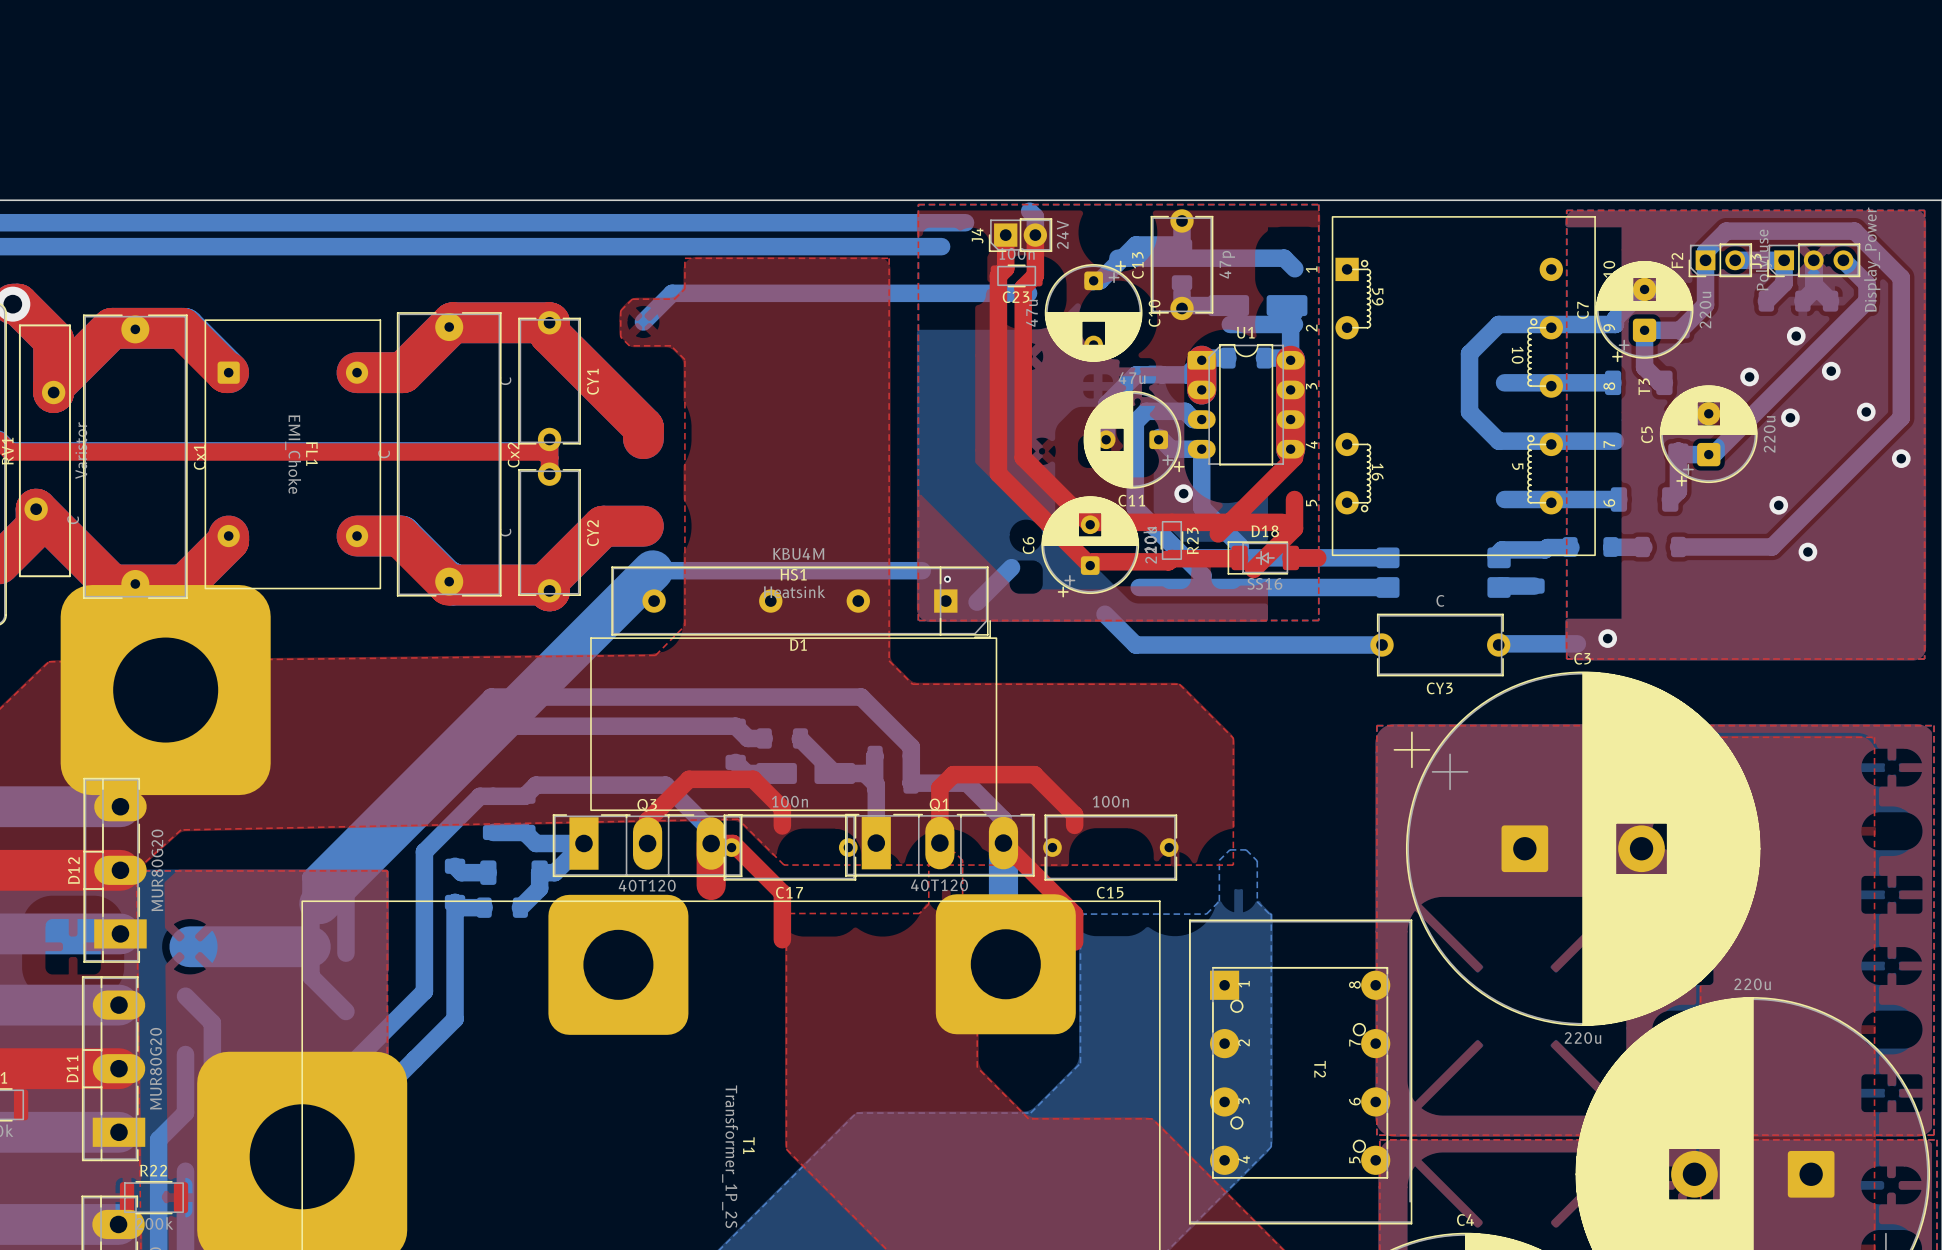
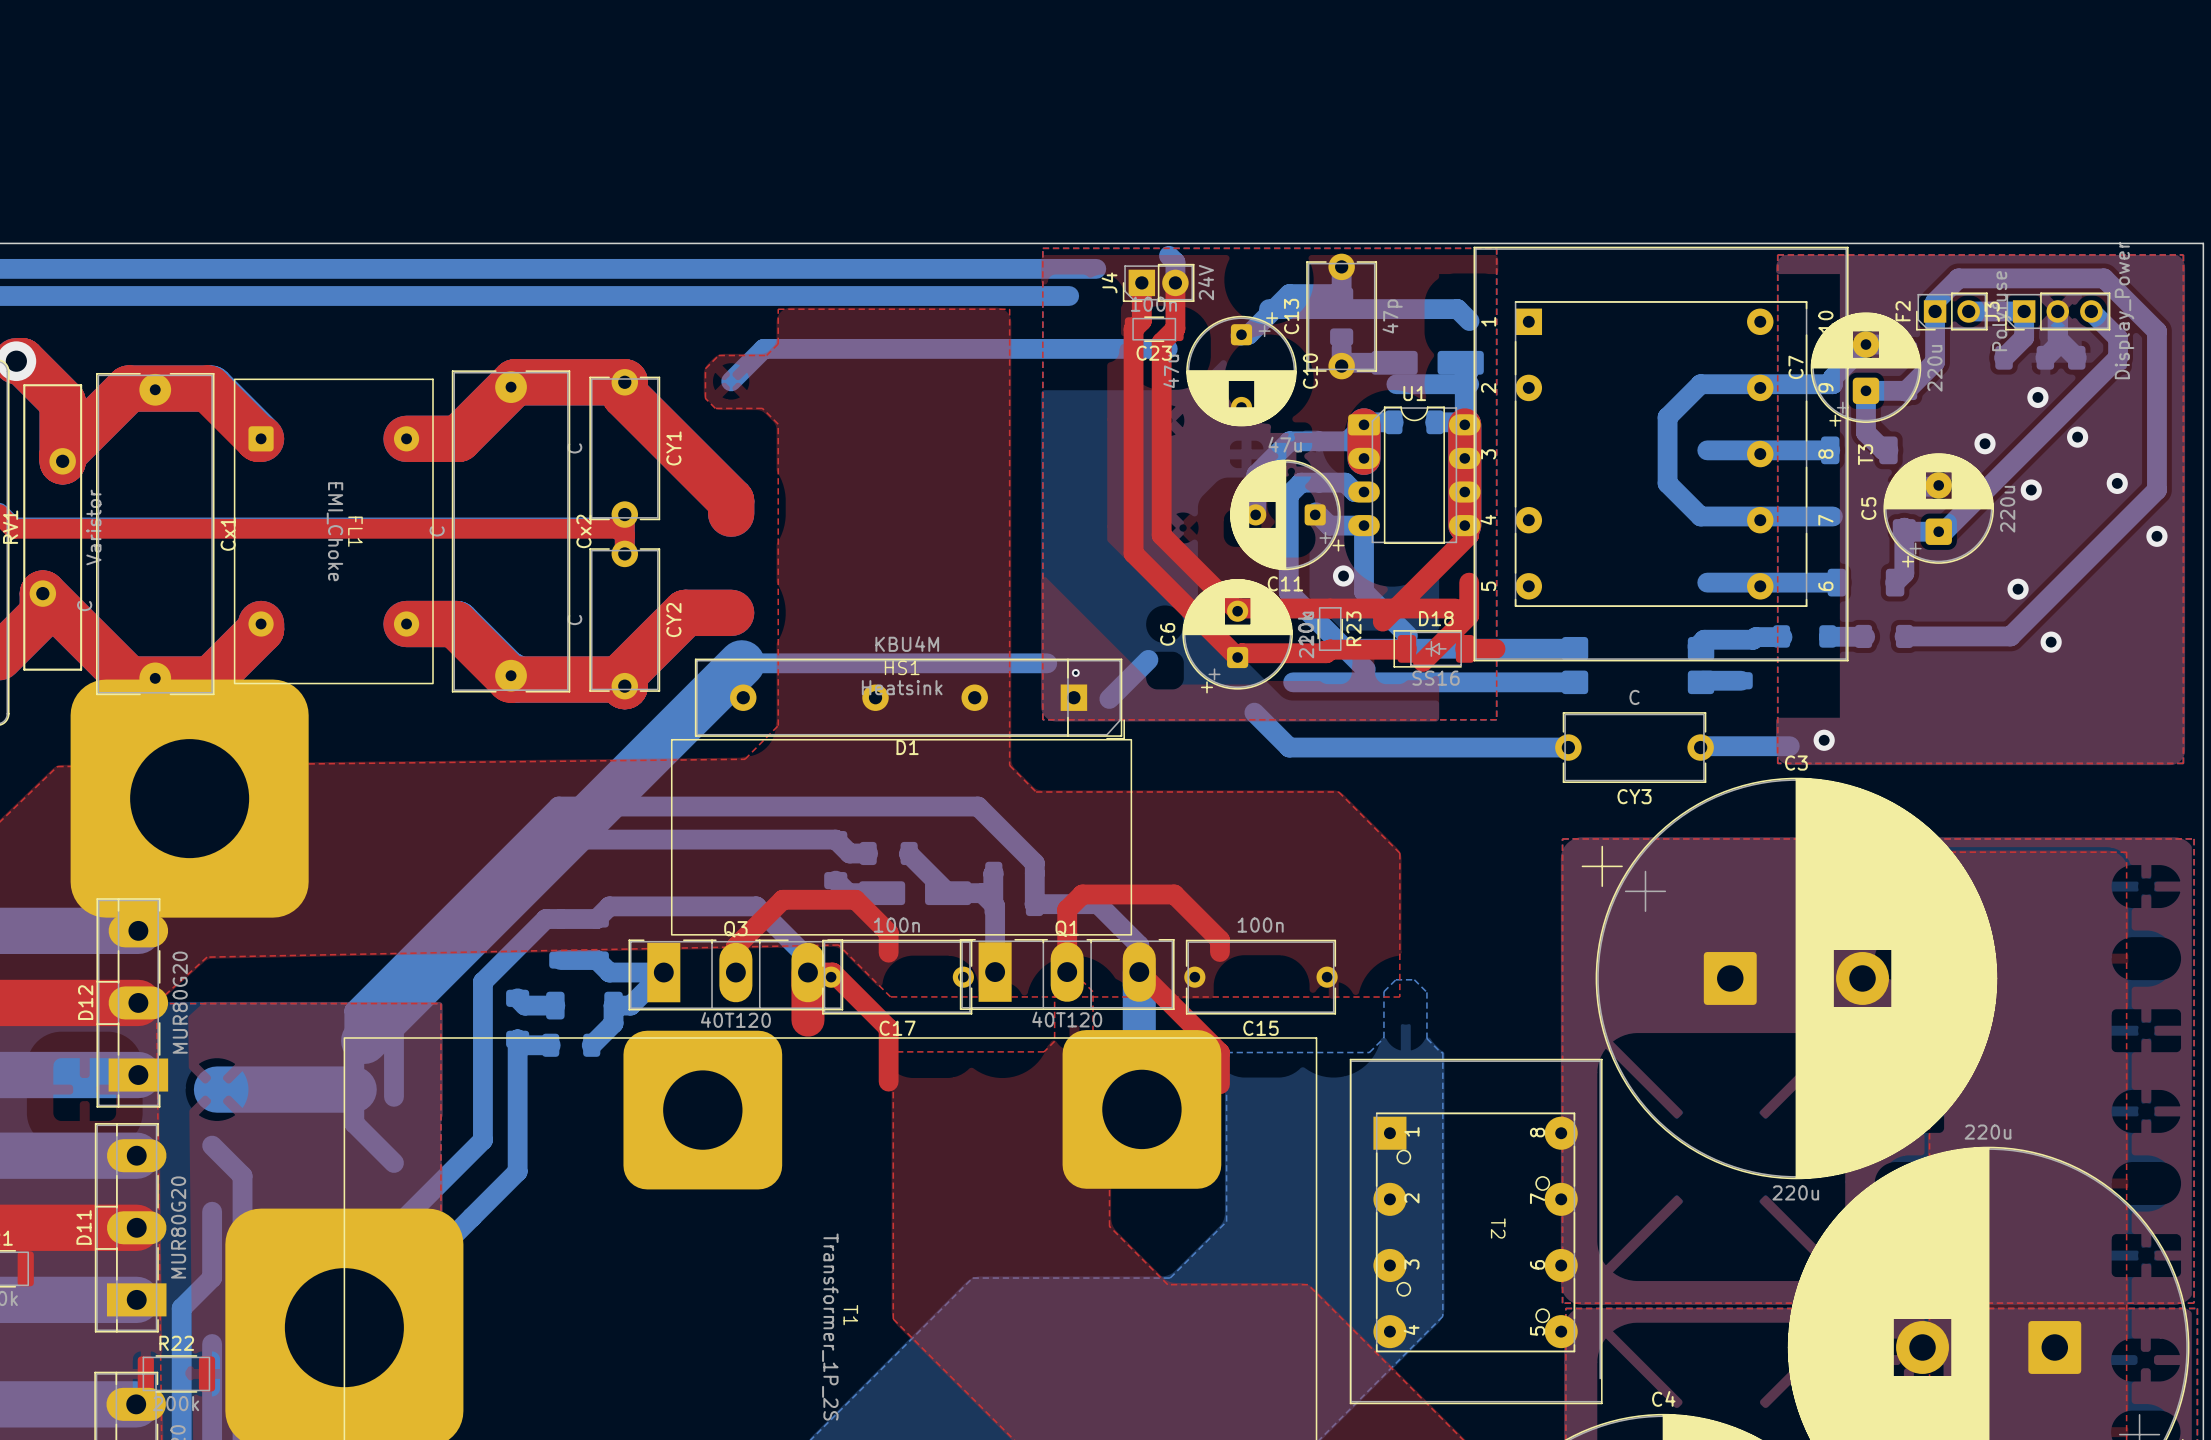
T3 footprint: [1331, 216, 1596, 556] -> [1473, 246, 1849, 662]

